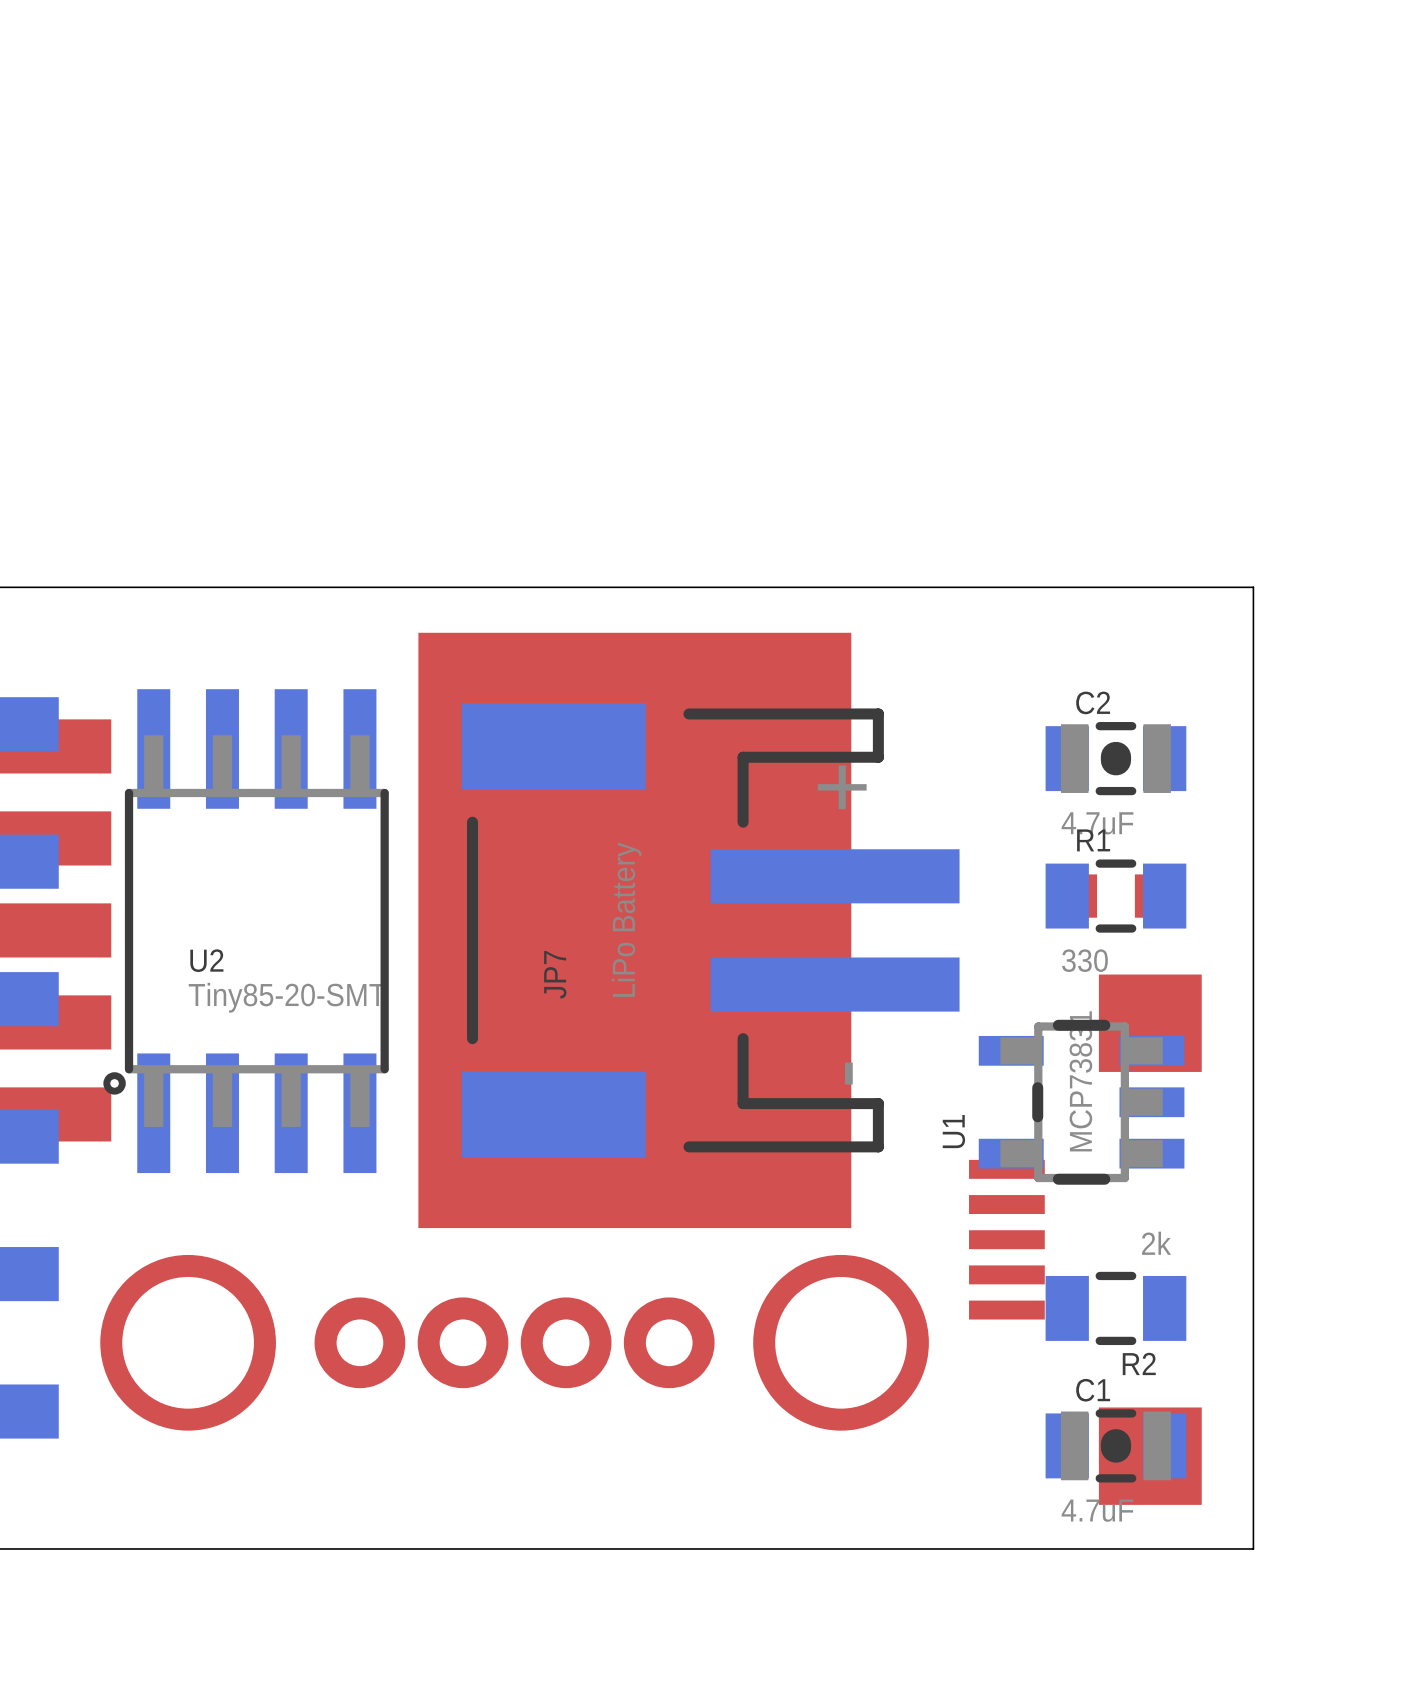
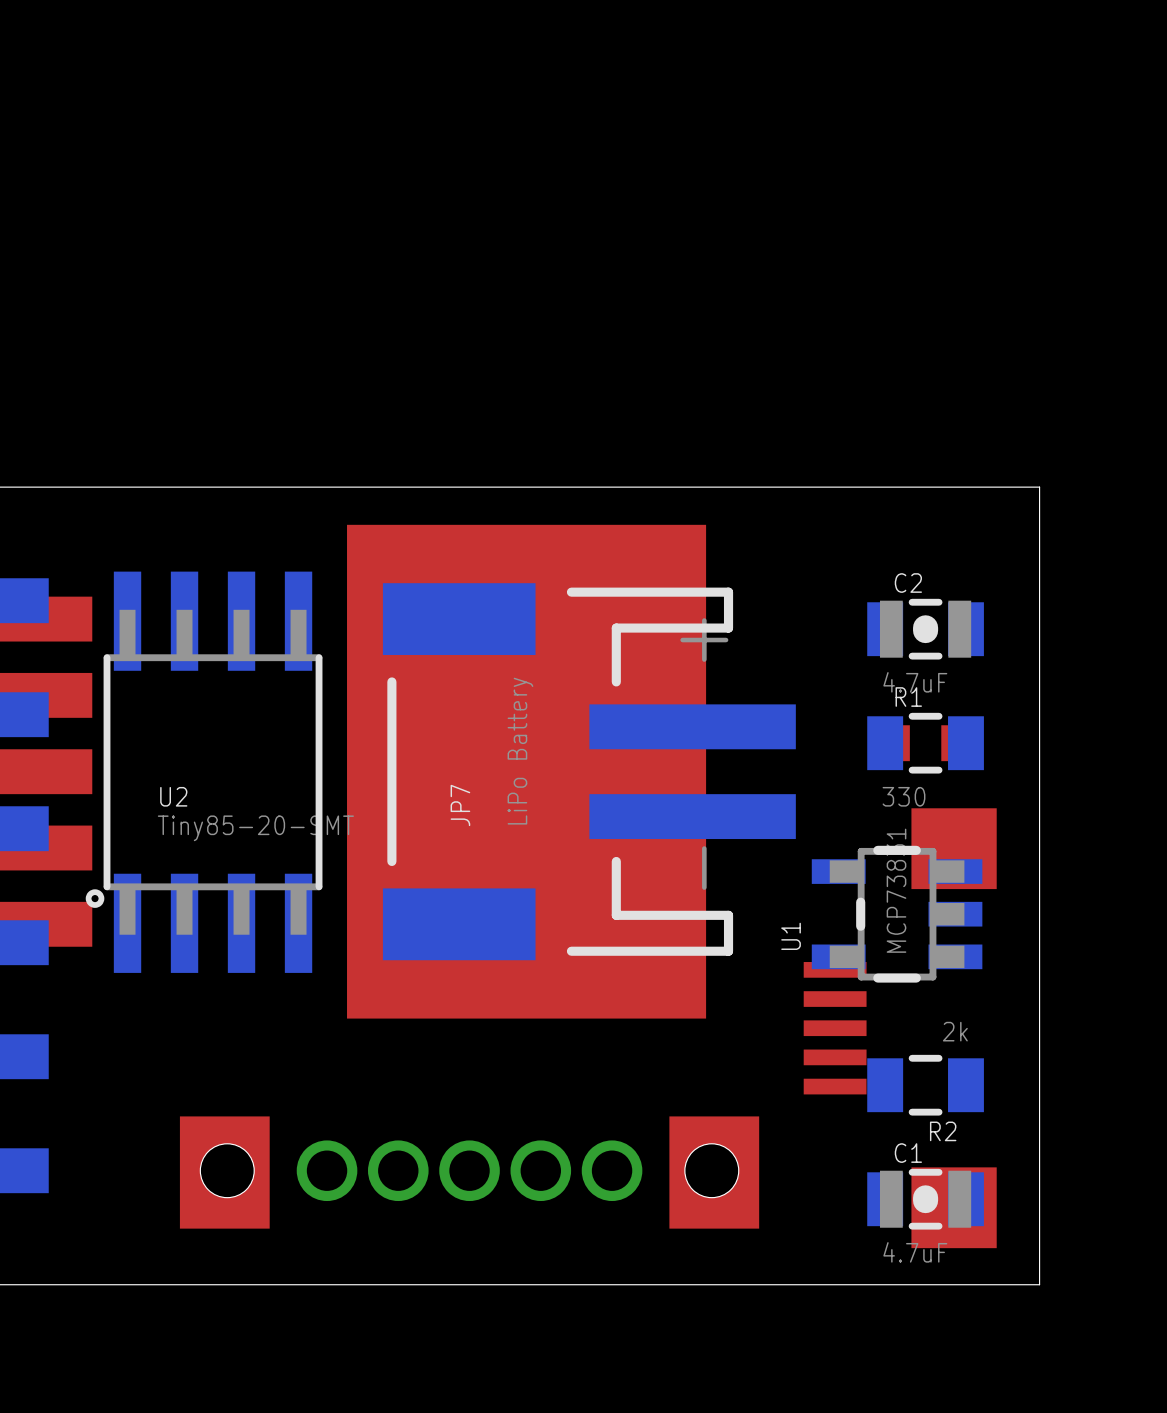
drawing: [100, 1254, 929, 1431] -> none
part: none -> (469, 1172)

